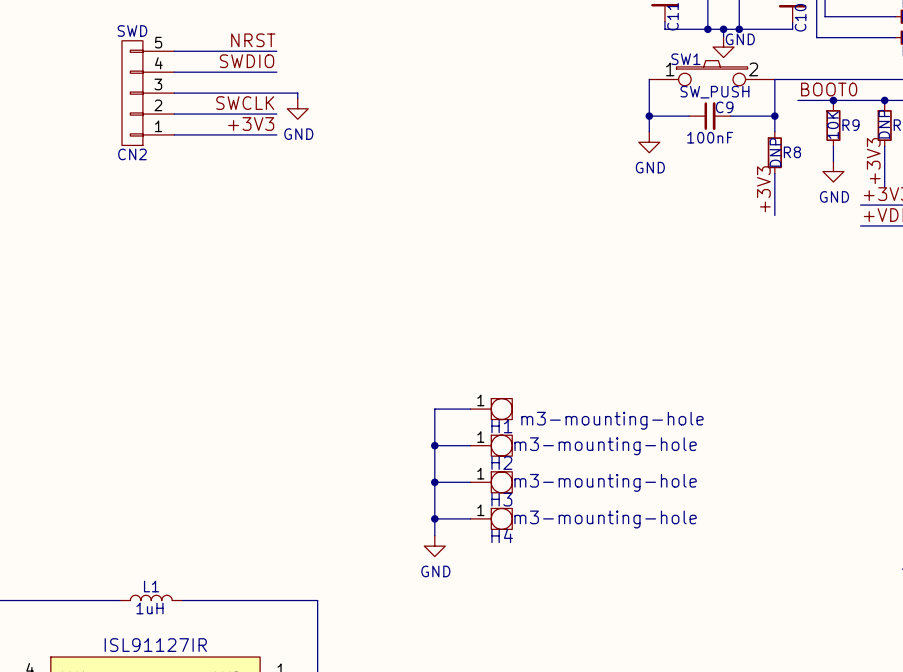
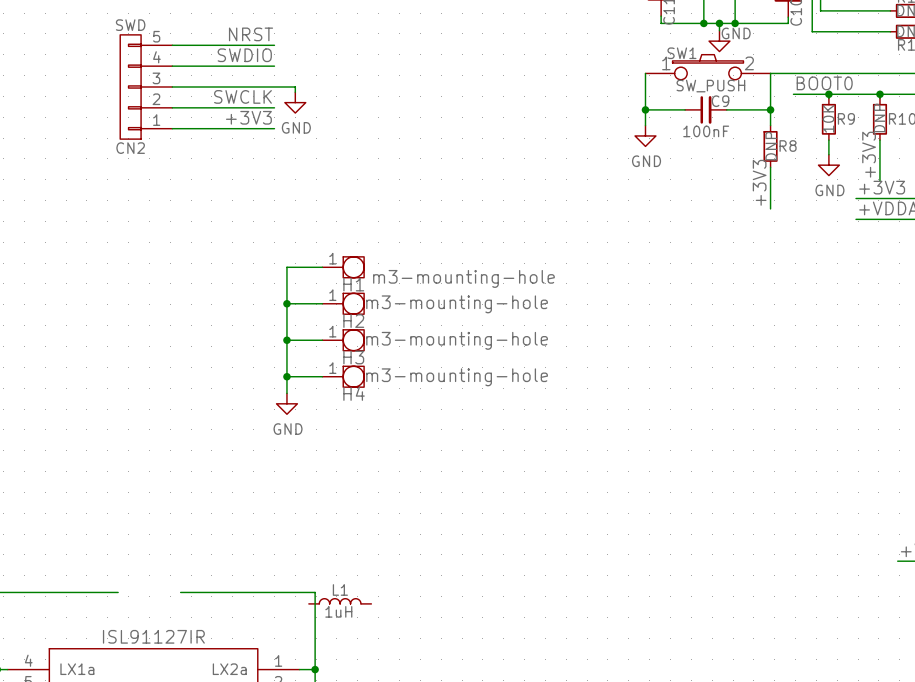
junction: none -> (286, 303)
junction: none -> (286, 340)
junction: none -> (286, 376)
wire: (470, 409) (434, 409) (434, 535) -> (322, 267) (286, 267) (286, 393)
H1 position: (491, 409) -> (343, 267)
power symbol: none -> GND (286, 403)
wire: (434, 445) (470, 445) -> (286, 303) (322, 303)
junction: (434, 445) -> none
H2 position: (491, 445) -> (343, 303)
wire: (434, 482) (470, 482) -> (286, 340) (322, 340)
junction: (434, 482) -> none
H3 position: (491, 482) -> (343, 340)
wire: (434, 518) (470, 518) -> (286, 376) (322, 376)
junction: (434, 518) -> none
H4 position: (491, 518) -> (343, 376)
power symbol: GND (434, 546) -> none
L1 position: (151, 597) -> (340, 601)

